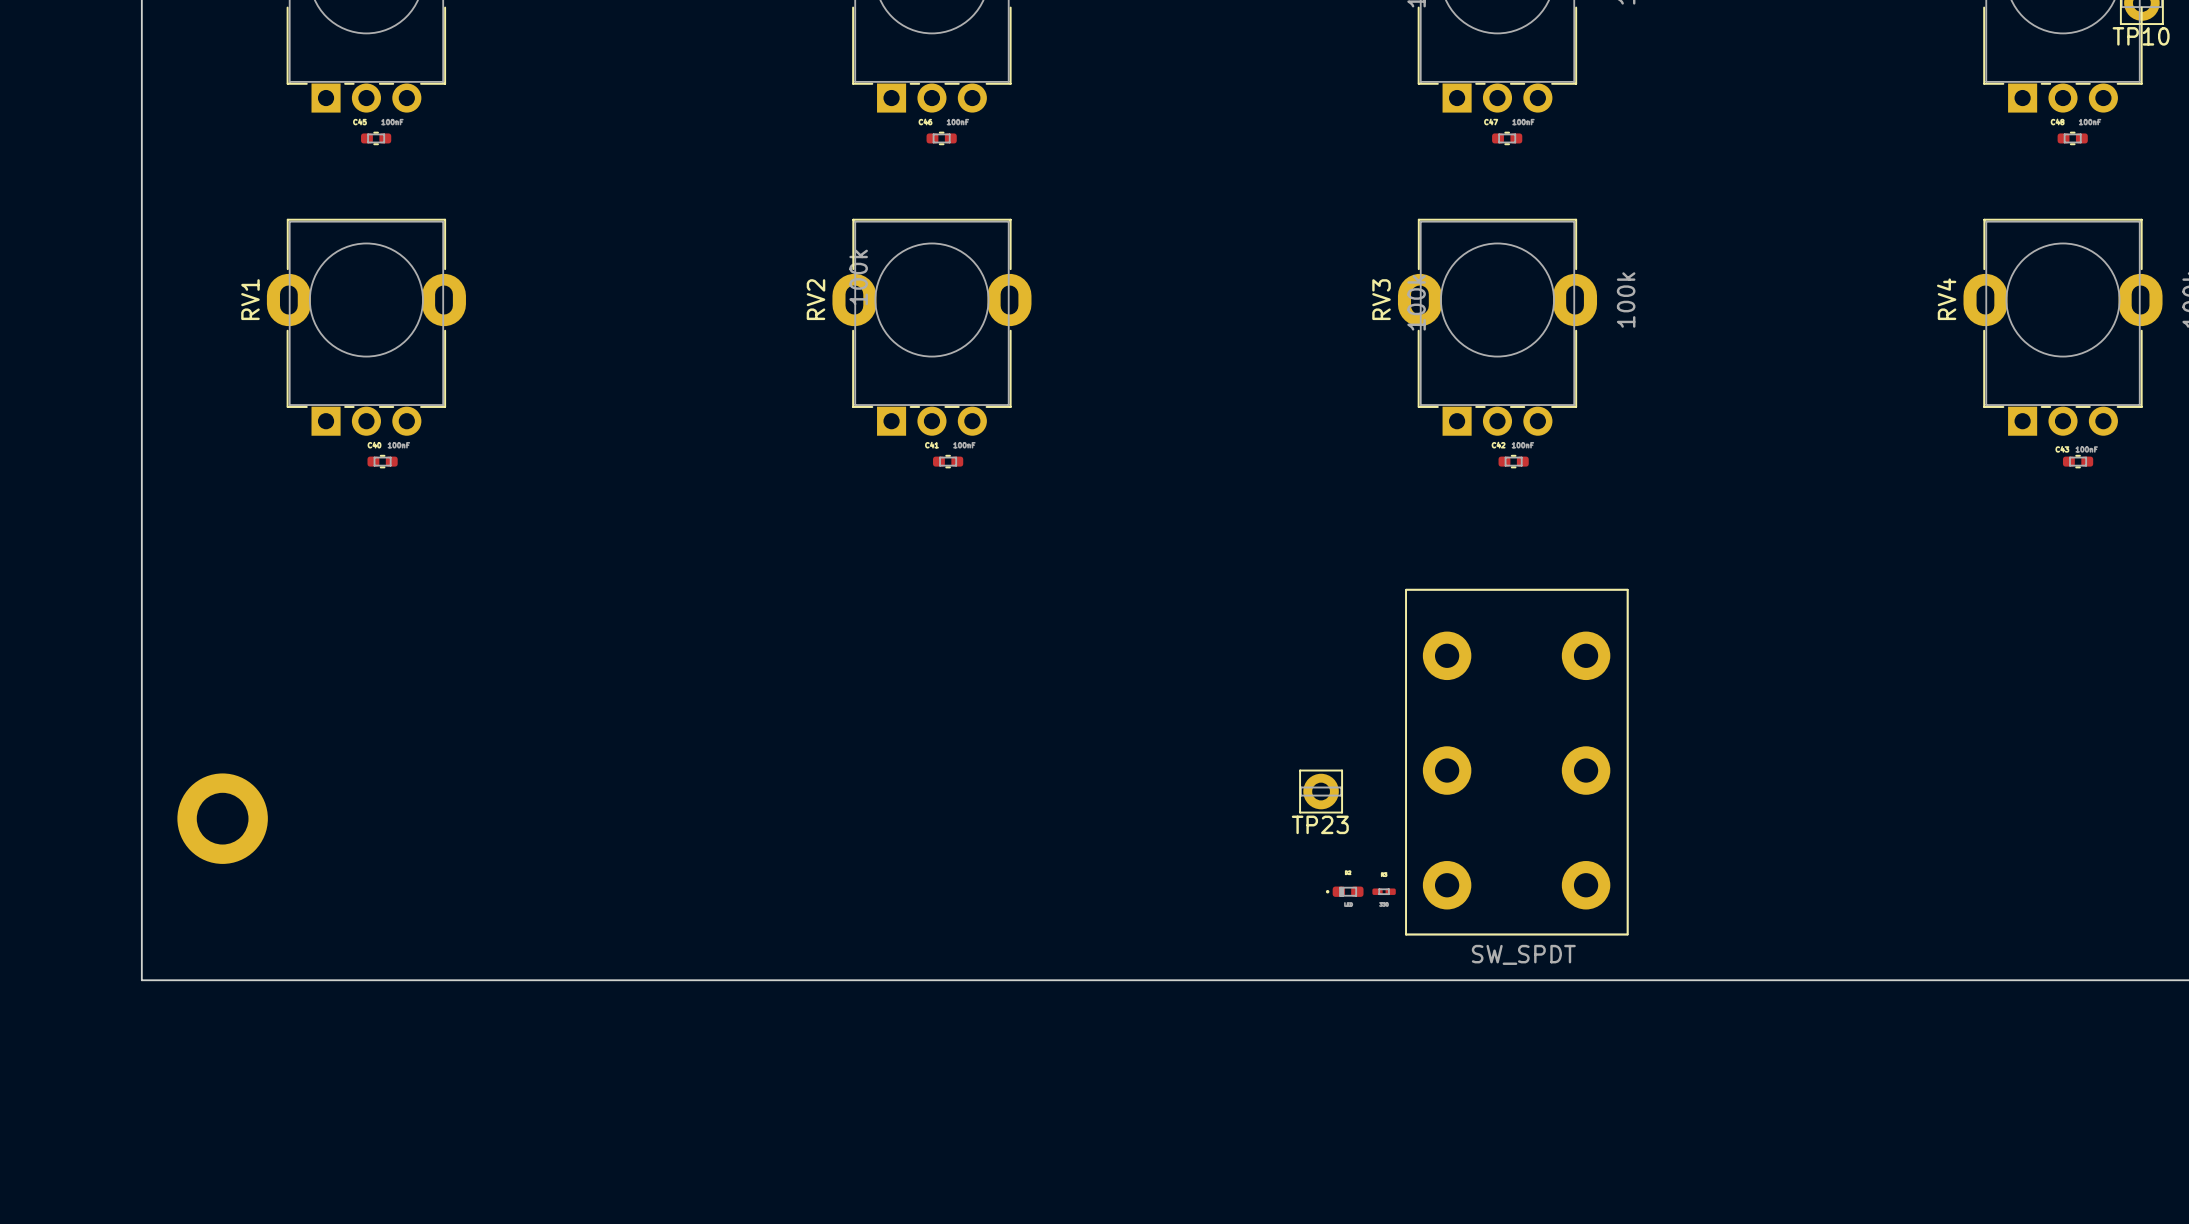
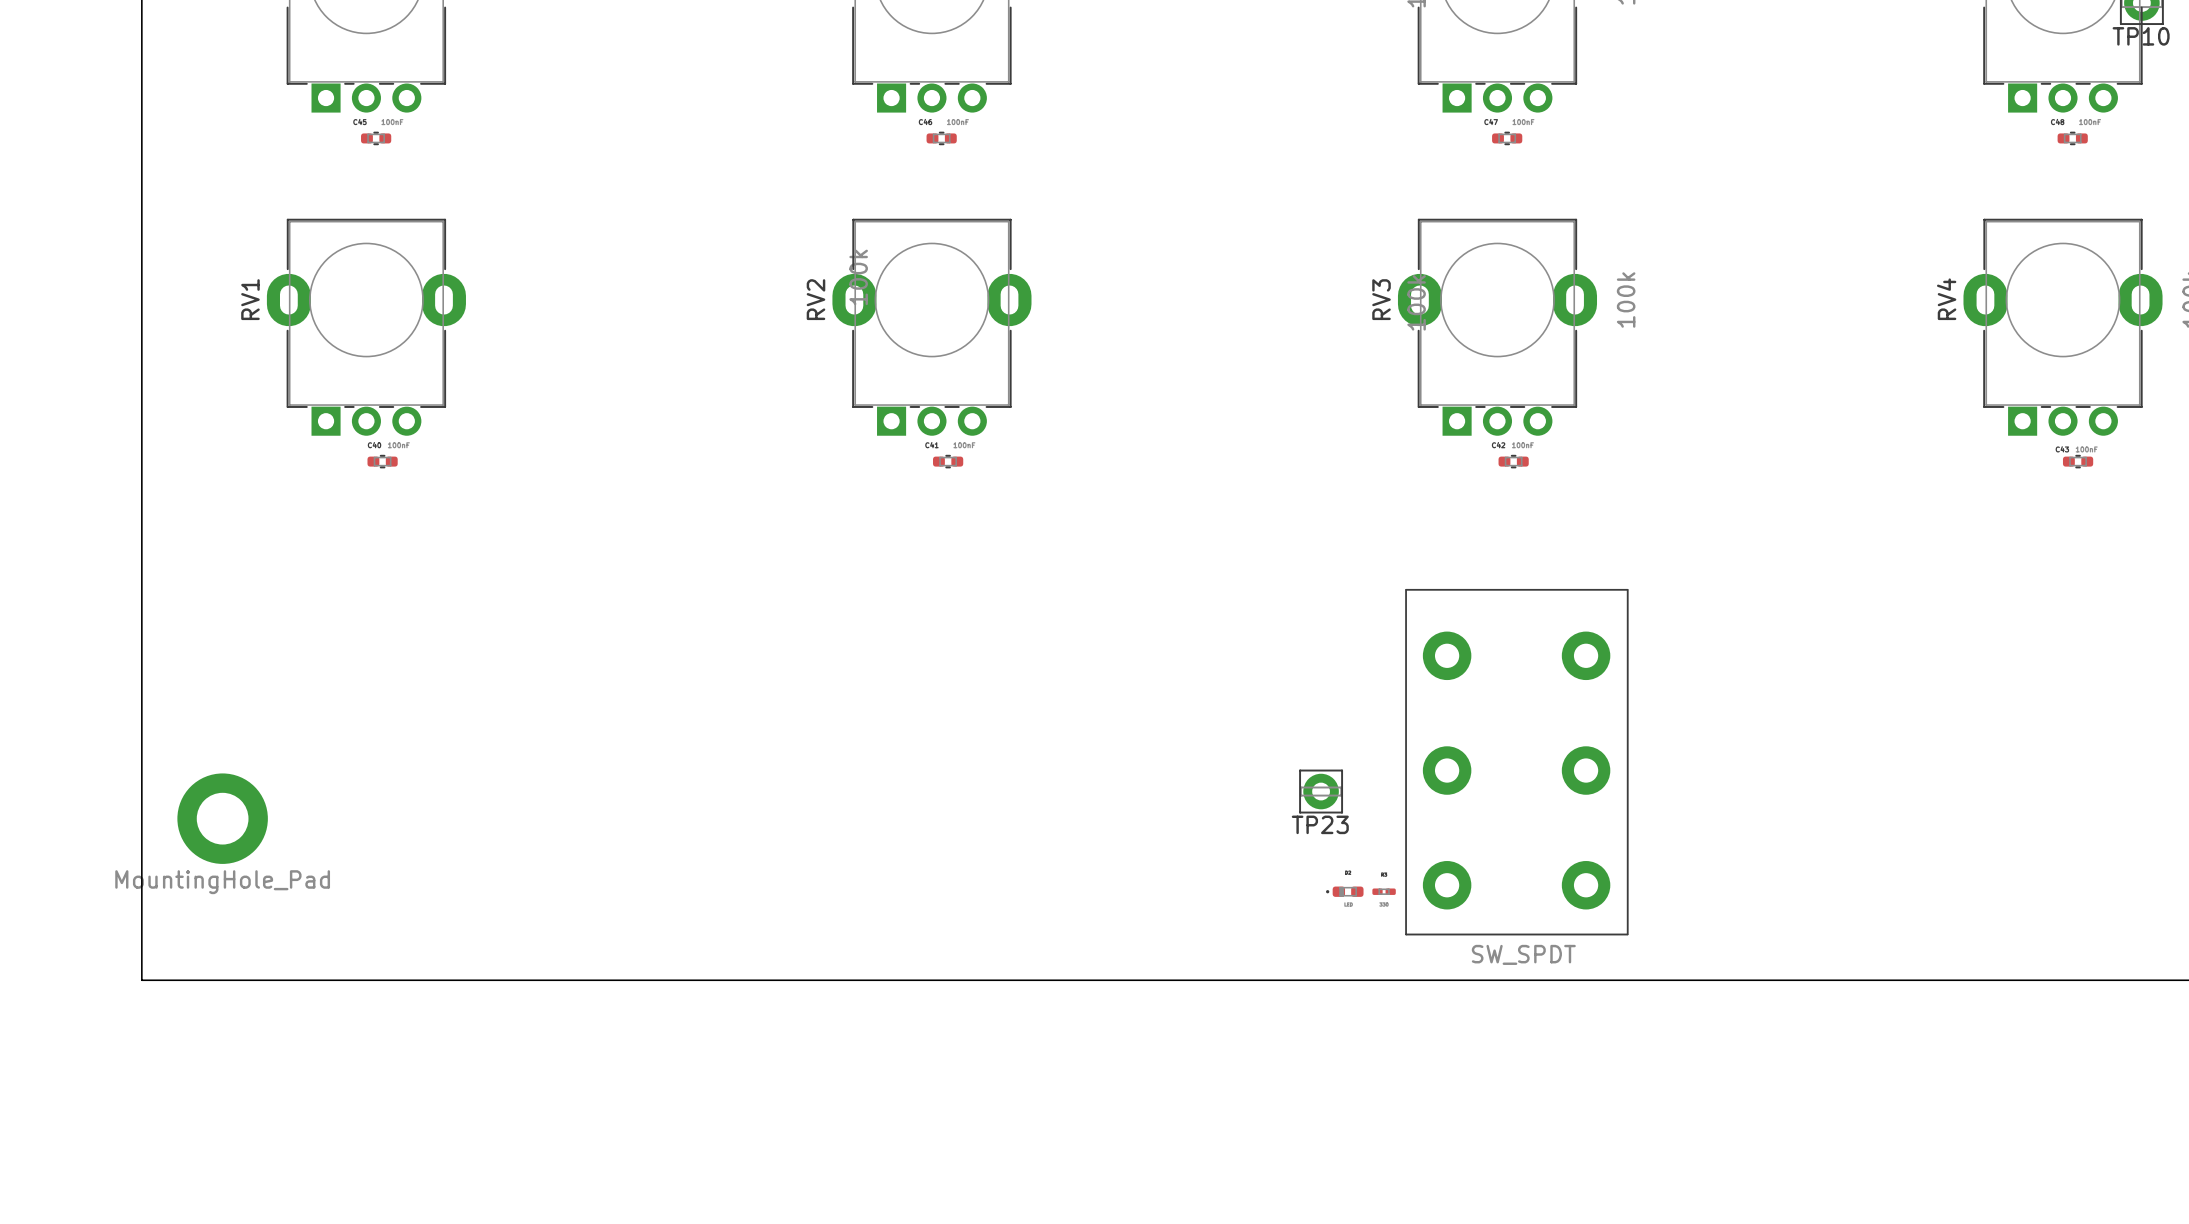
part value: none -> MountingHole_Pad (222, 882)

